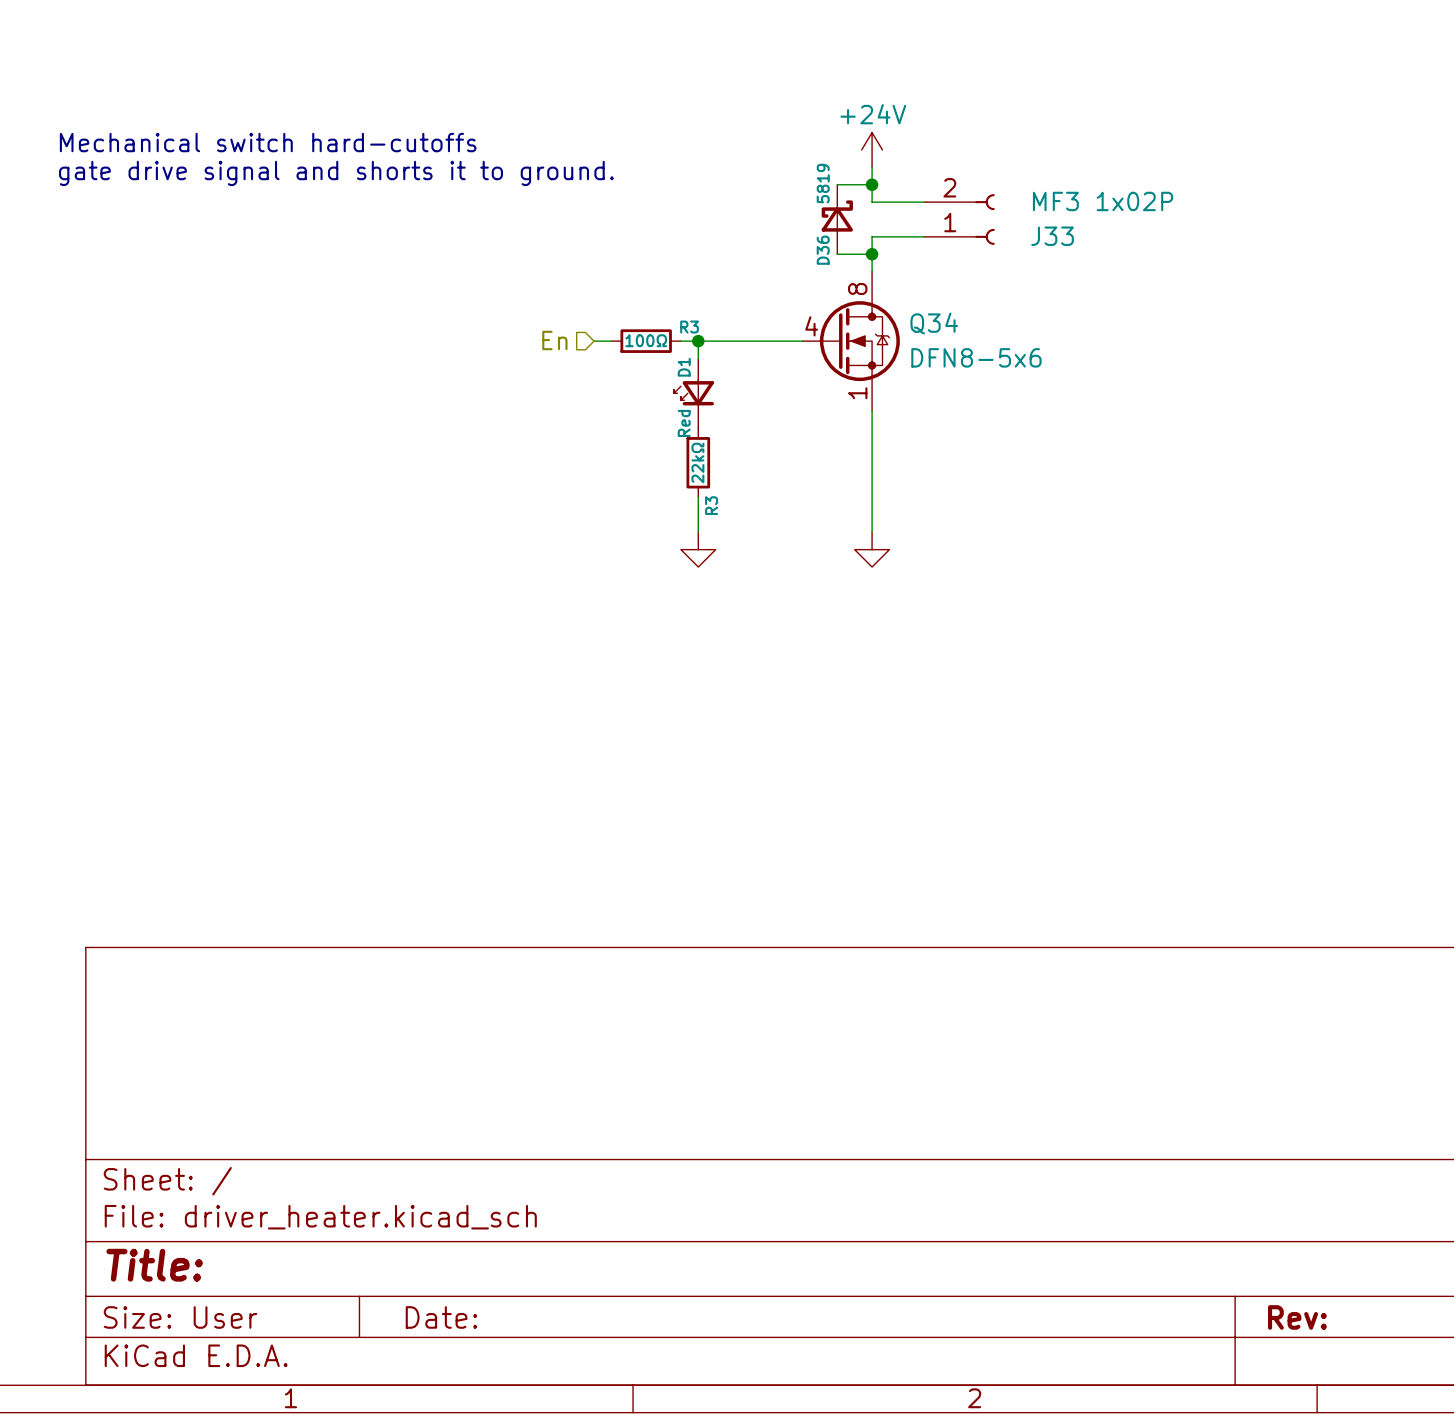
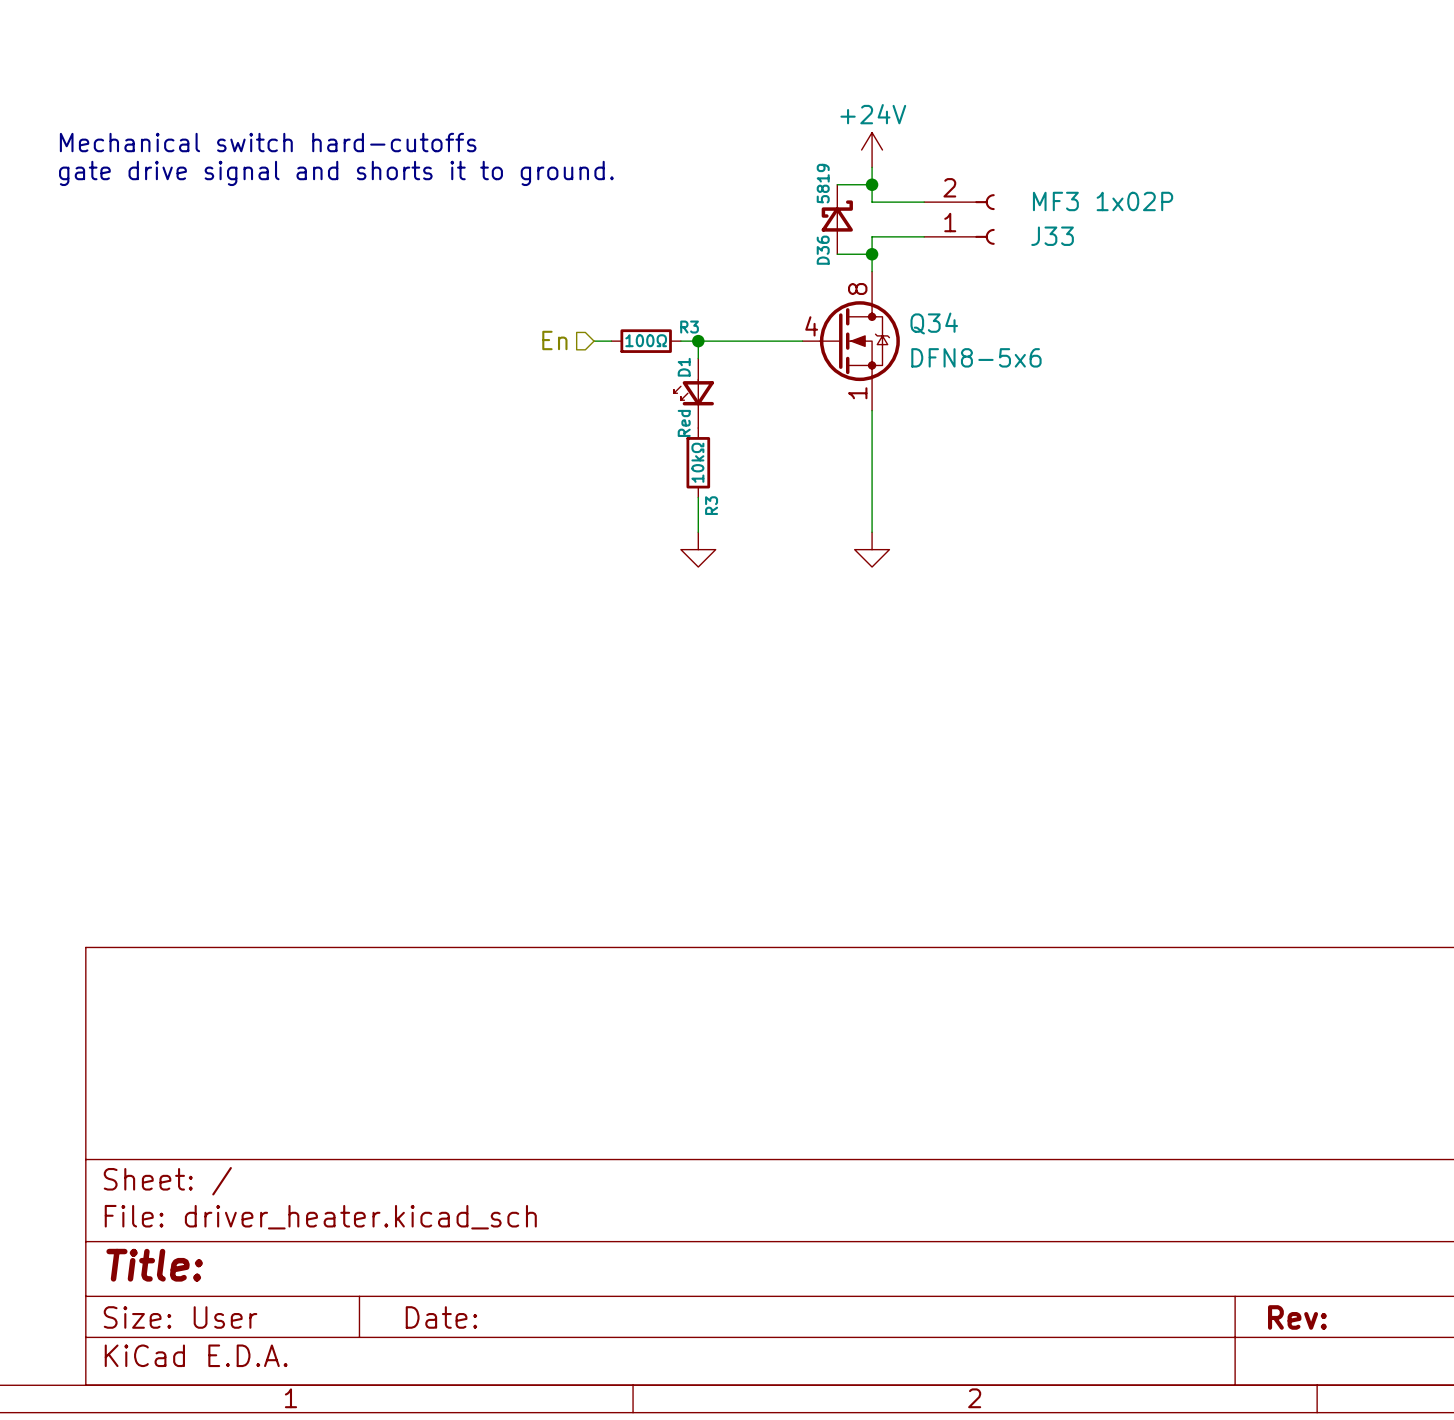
R3 value: 22kΩ (697, 463) -> 10kΩ (697, 462)

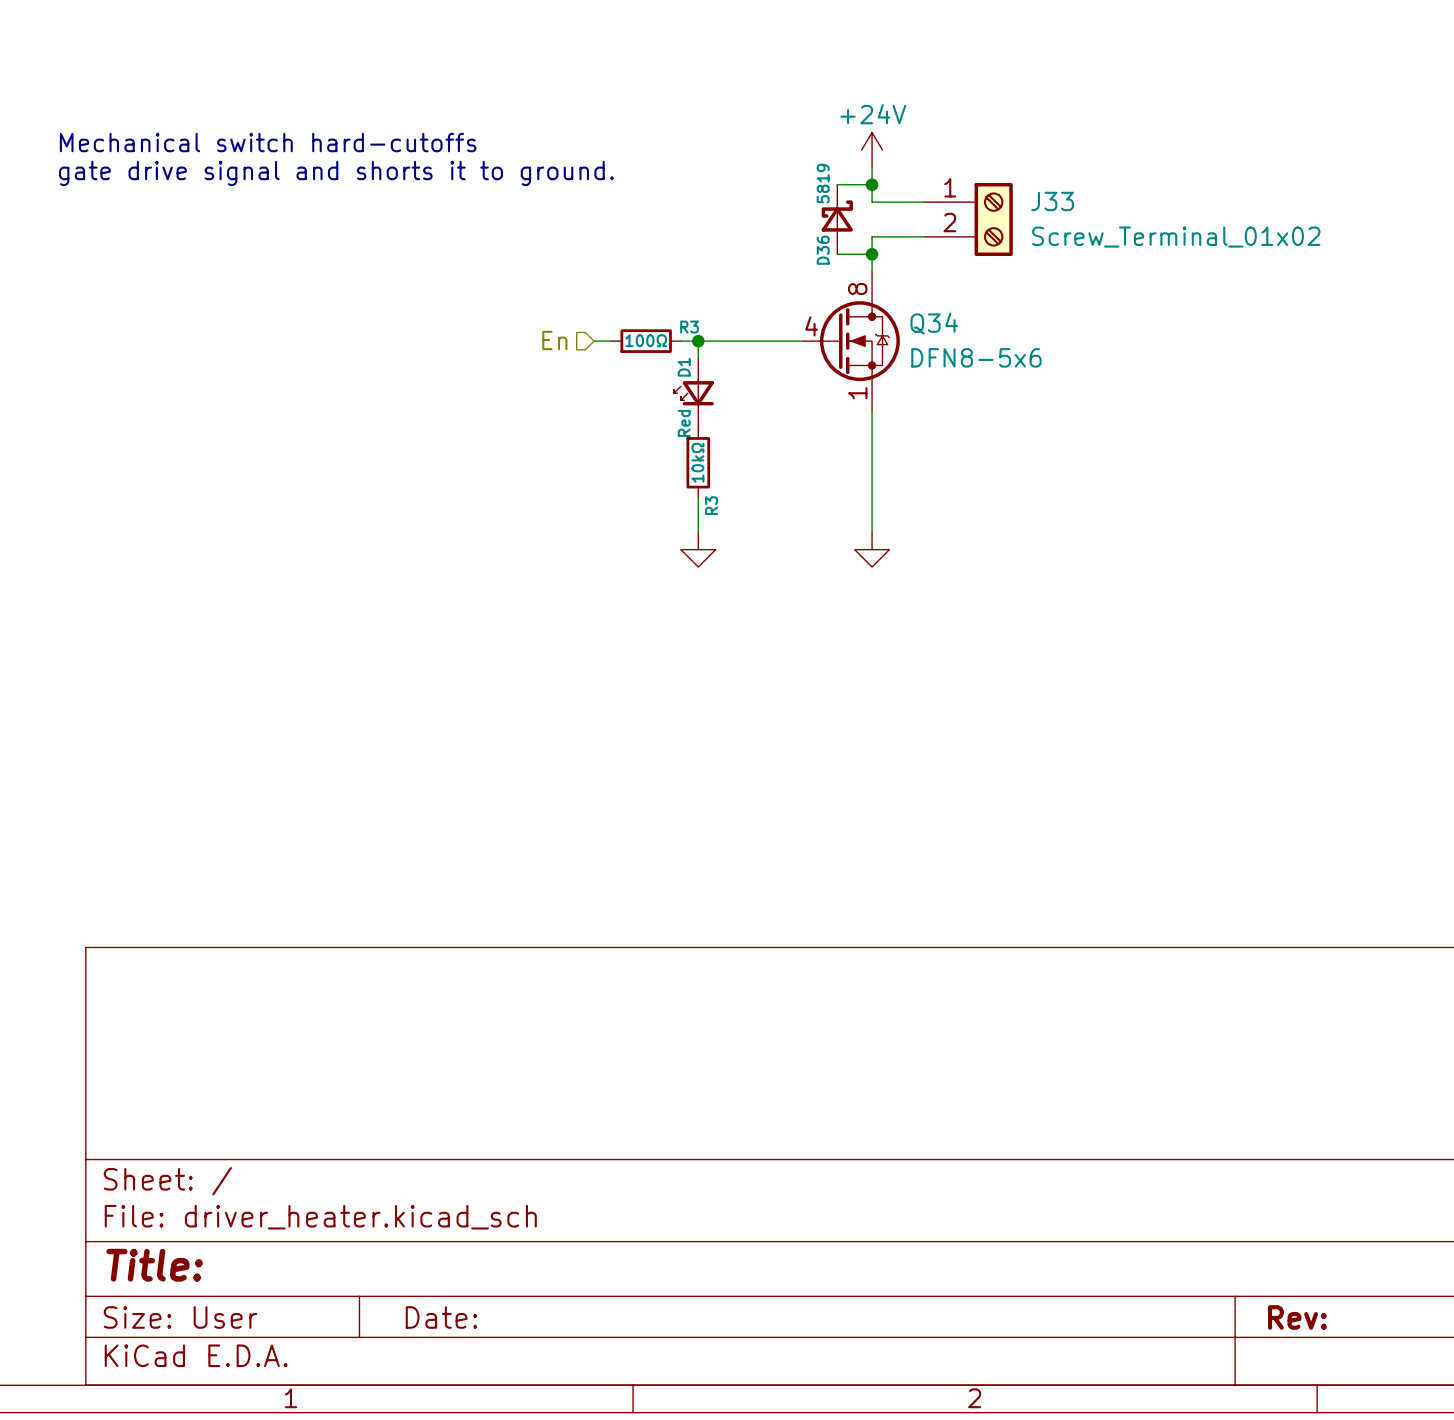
J33 symbol: [924, 194, 995, 245] -> [924, 183, 1013, 256]
J33 value: MF3 1x02P (1103, 201) -> Screw_Terminal_01x02 (1176, 237)
J33 name position: J33 (1052, 236) -> J33 (1052, 201)

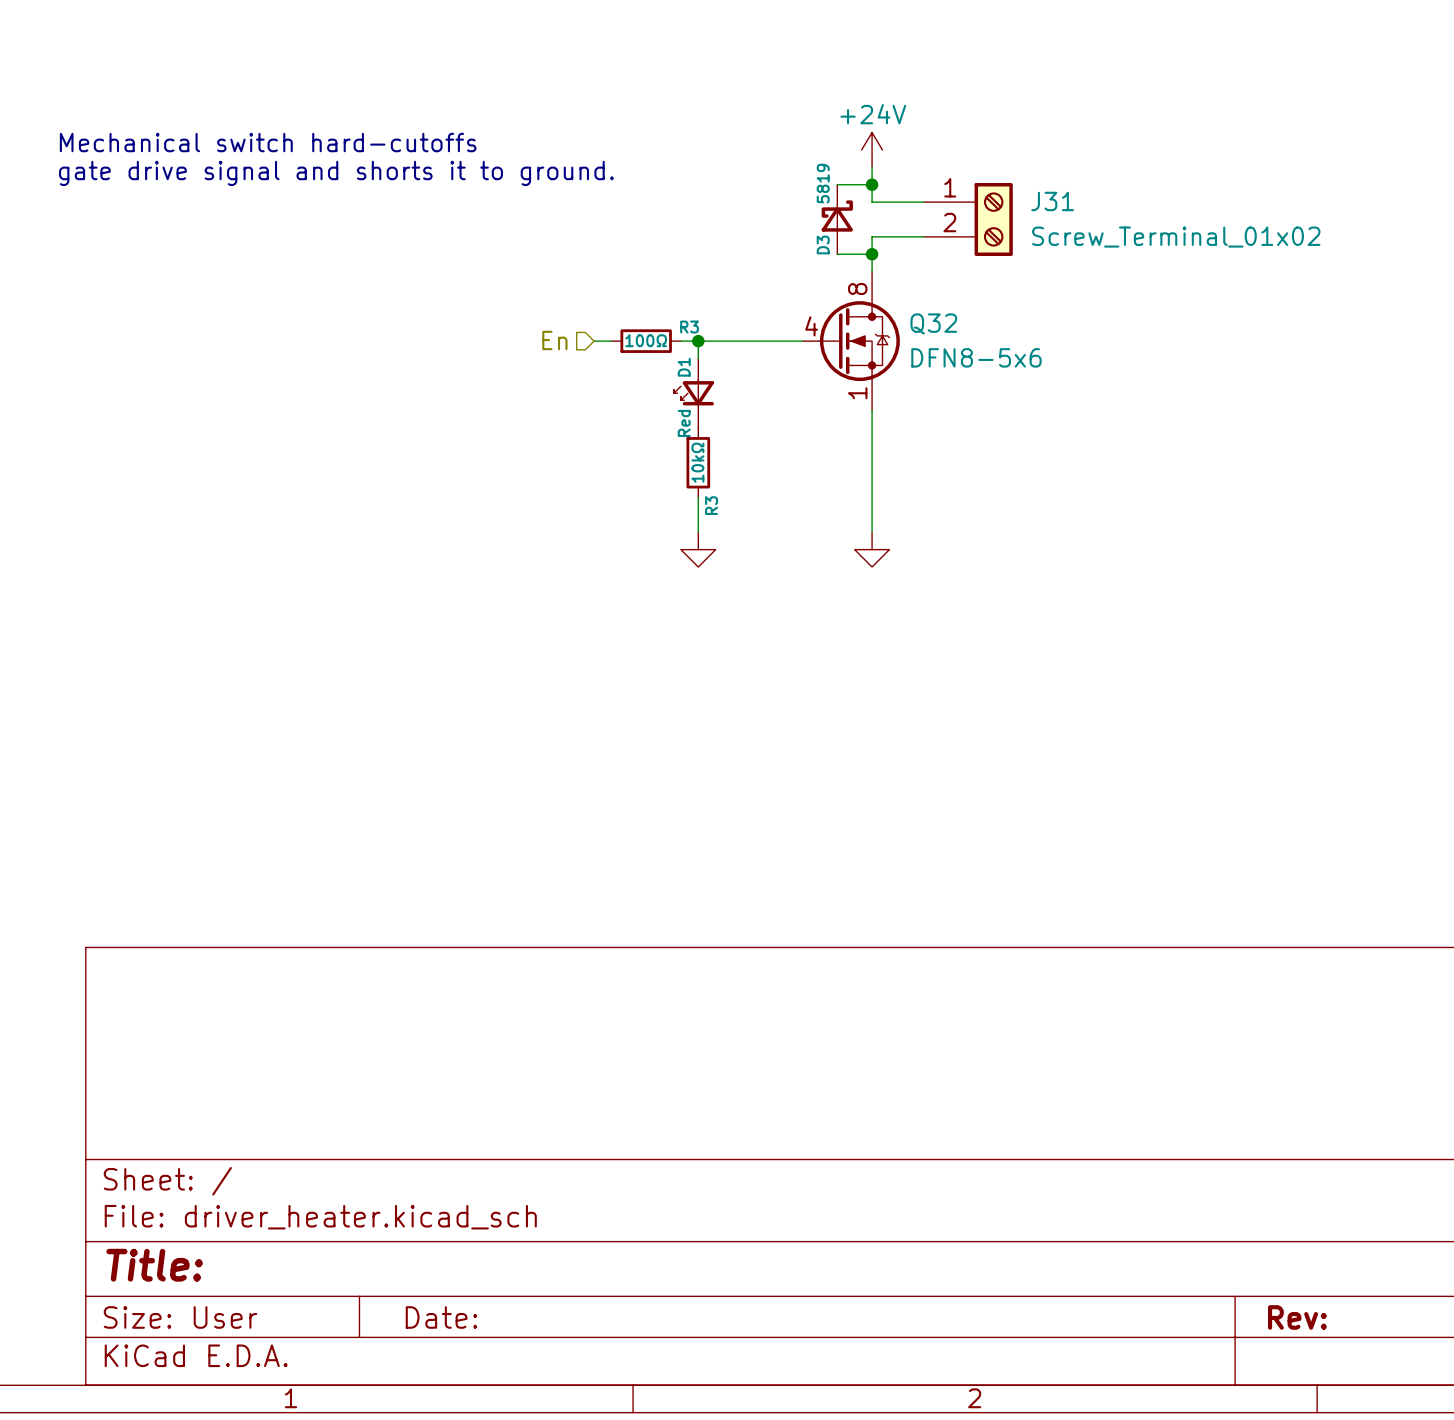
J33 name: J33 (1052, 201) -> J31 (1052, 201)
D36 name: D36 (823, 250) -> D3 (823, 244)
Q34 name: Q34 (934, 323) -> Q32 (933, 323)

